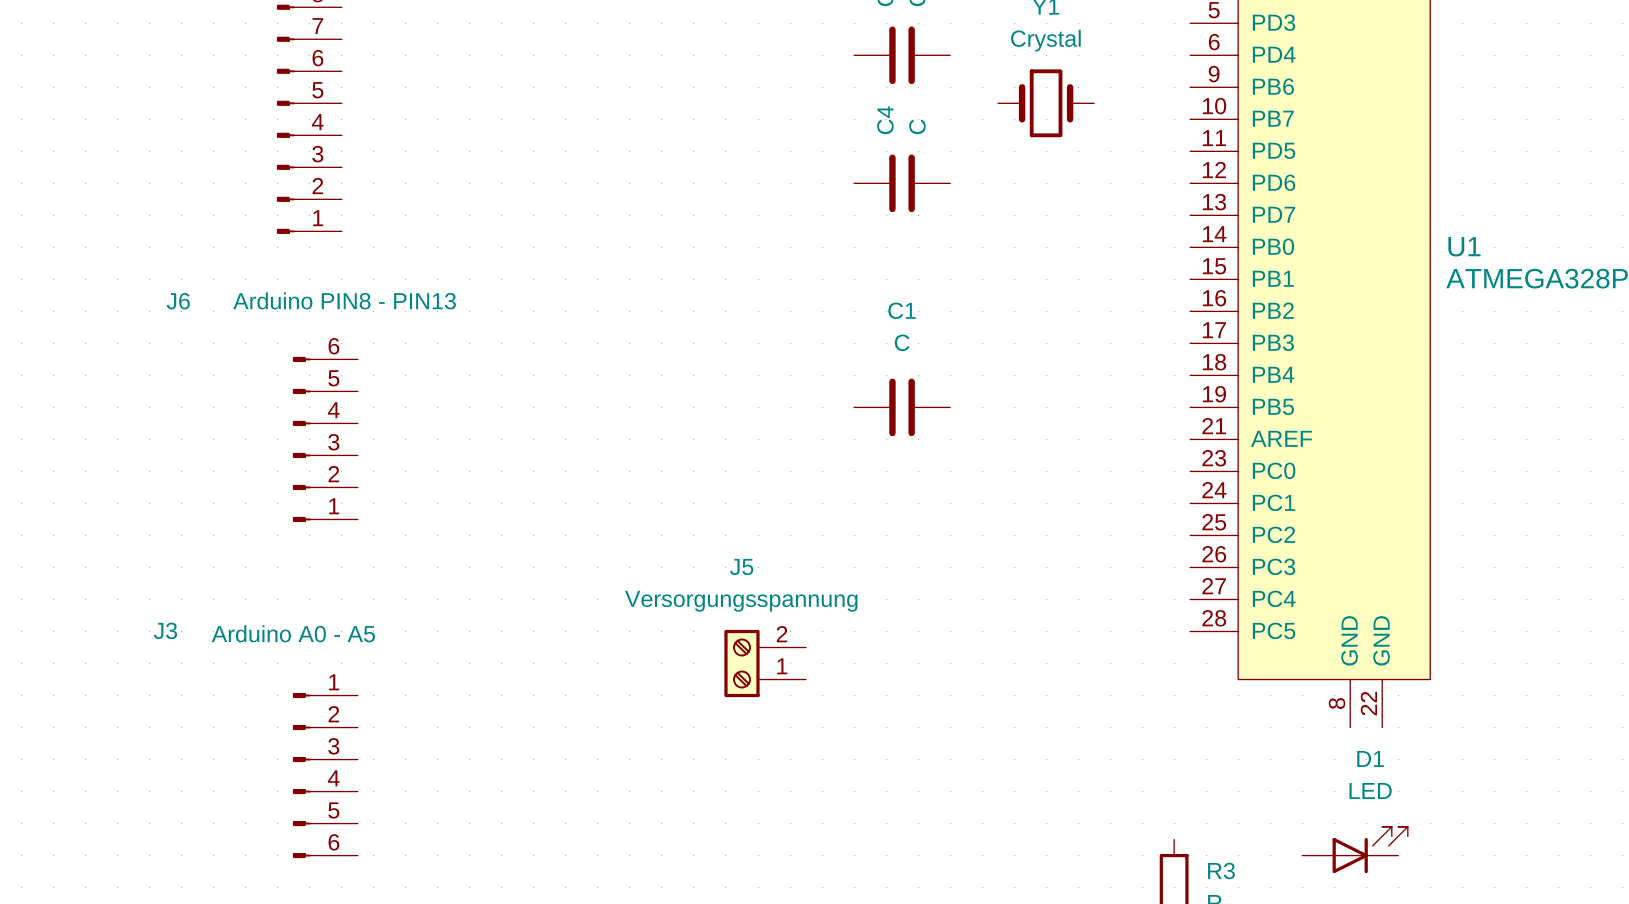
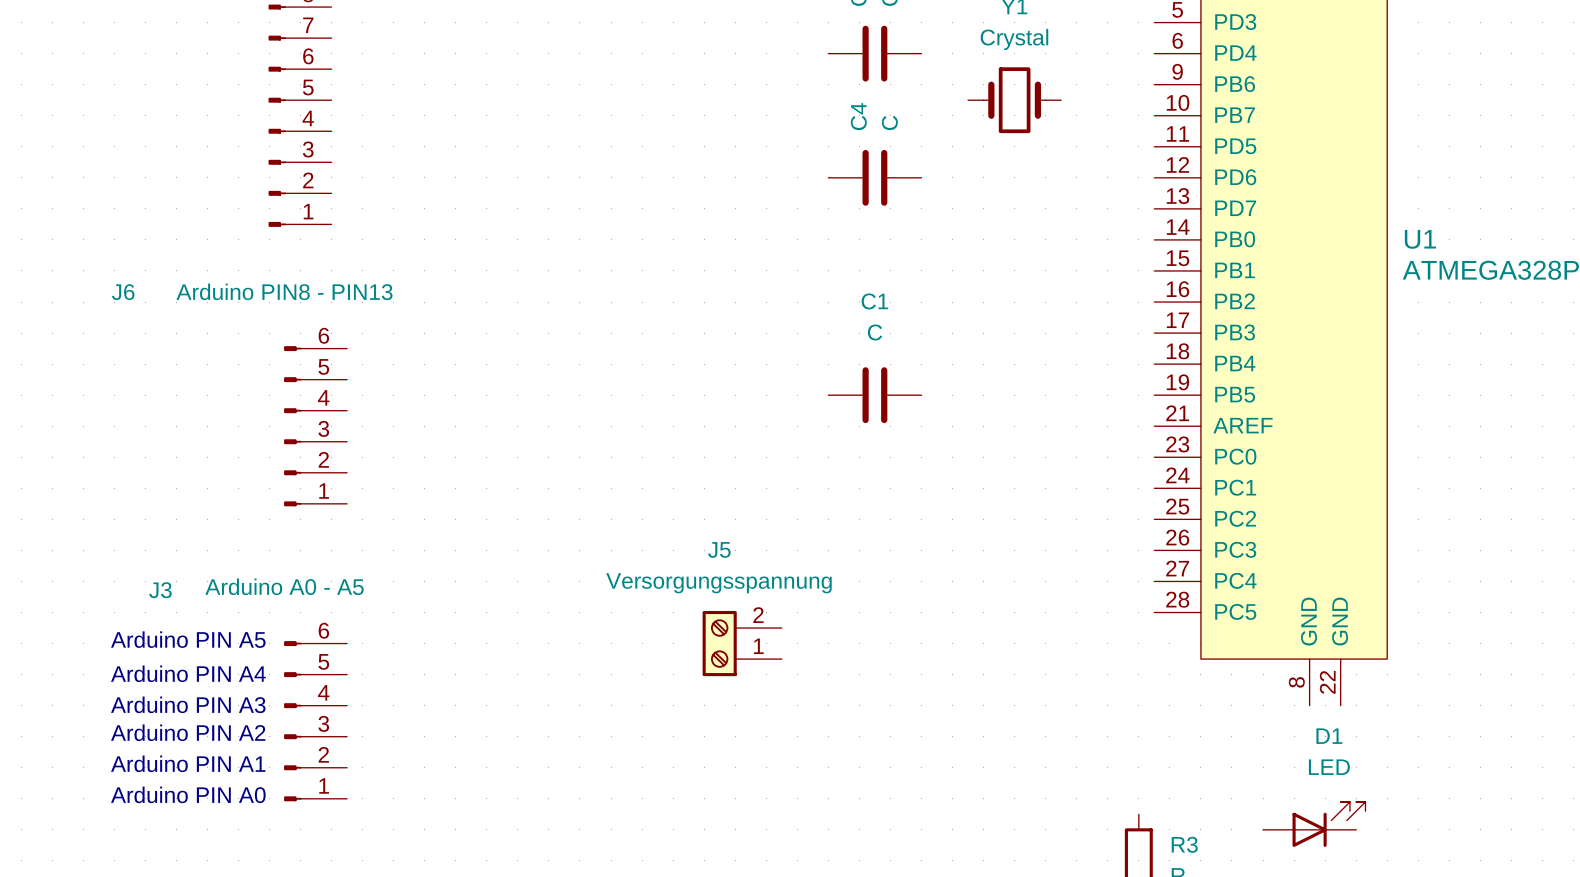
J6 value position: Arduino PIN8 - PIN13 (344, 300) -> Arduino PIN8 - PIN13 (284, 291)
J6 name position: J6 (178, 301) -> J6 (123, 292)
text: none -> Arduino PIN A5 (188, 639)
text: none -> Arduino PIN A4 (188, 673)
text: none -> Arduino PIN A3 (188, 704)
text: none -> Arduino PIN A2 (188, 732)
J3 flip: as is (301, 775) -> up-down (292, 721)
text: none -> Arduino PIN A1 (188, 763)
text: none -> Arduino PIN A0 (188, 794)

